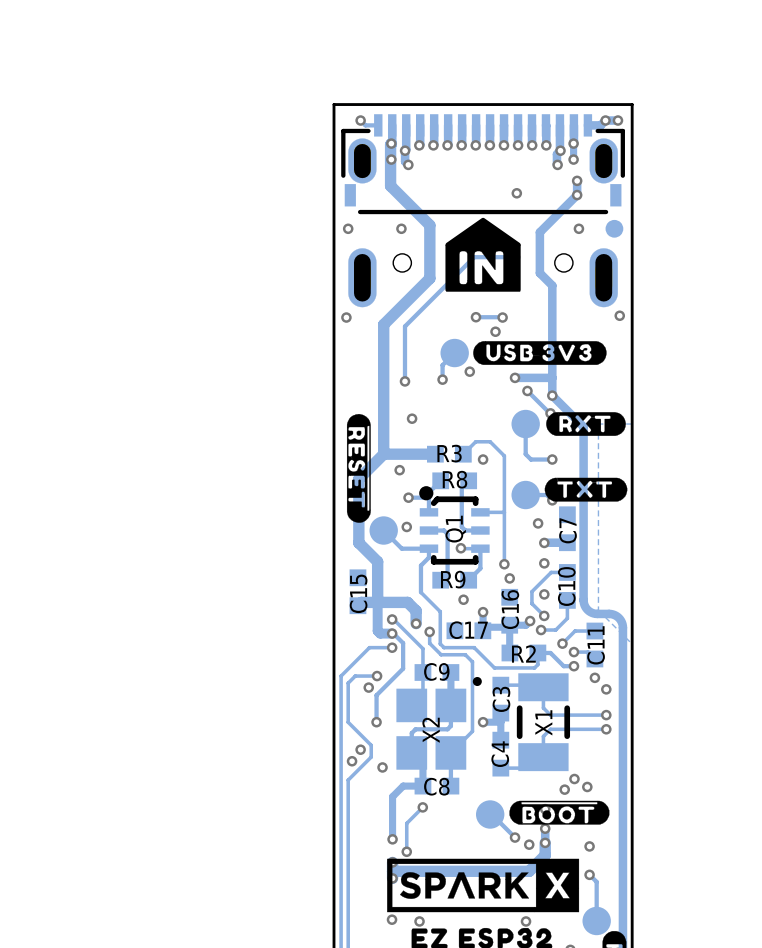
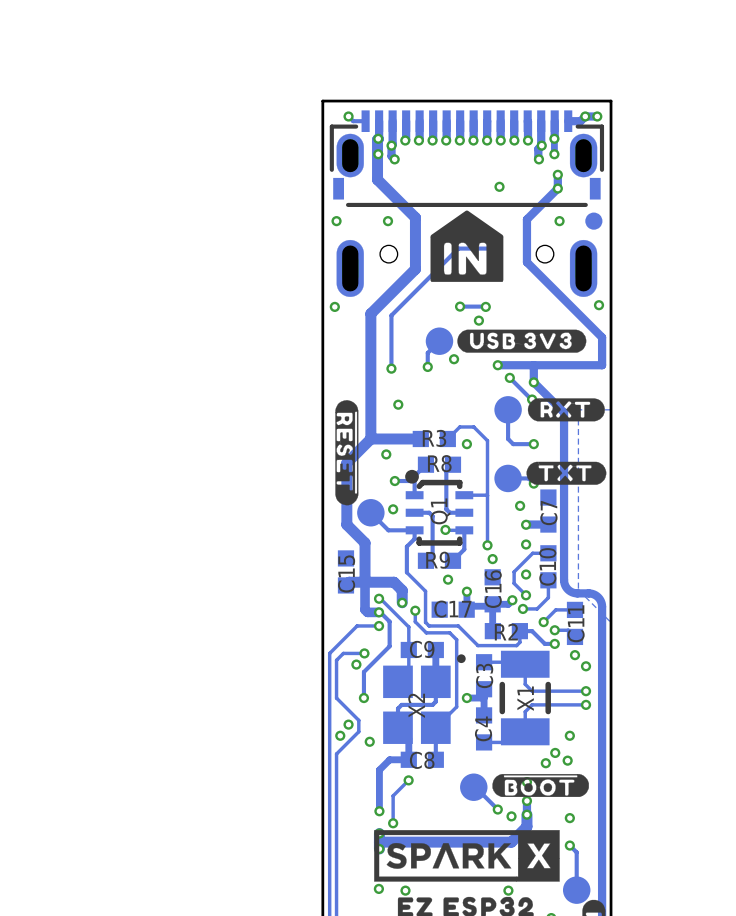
track: (545, 227) (539, 232) (539, 273) (552, 285) (552, 377) -> (526, 219) (526, 262) (602, 337) (602, 365) (533, 365)
via: none -> (569, 735)

